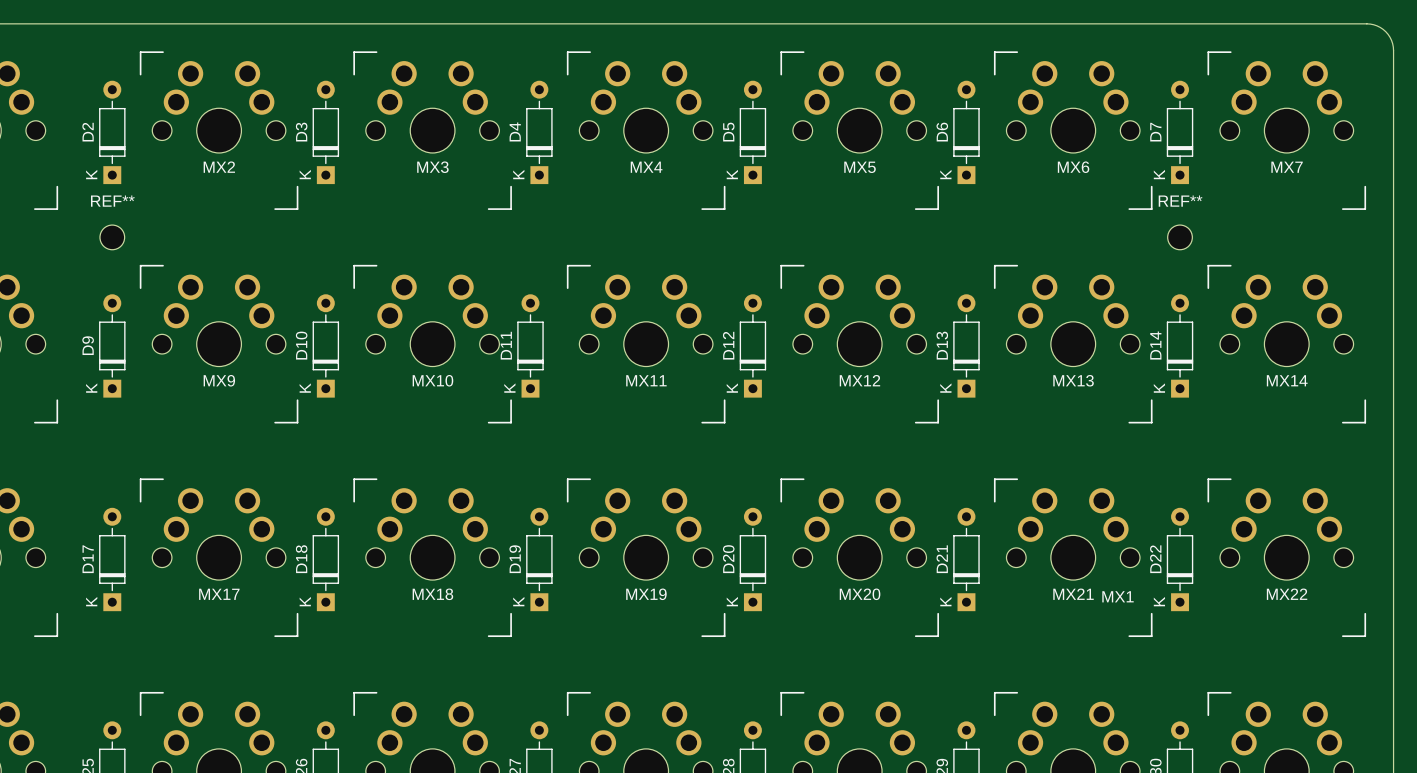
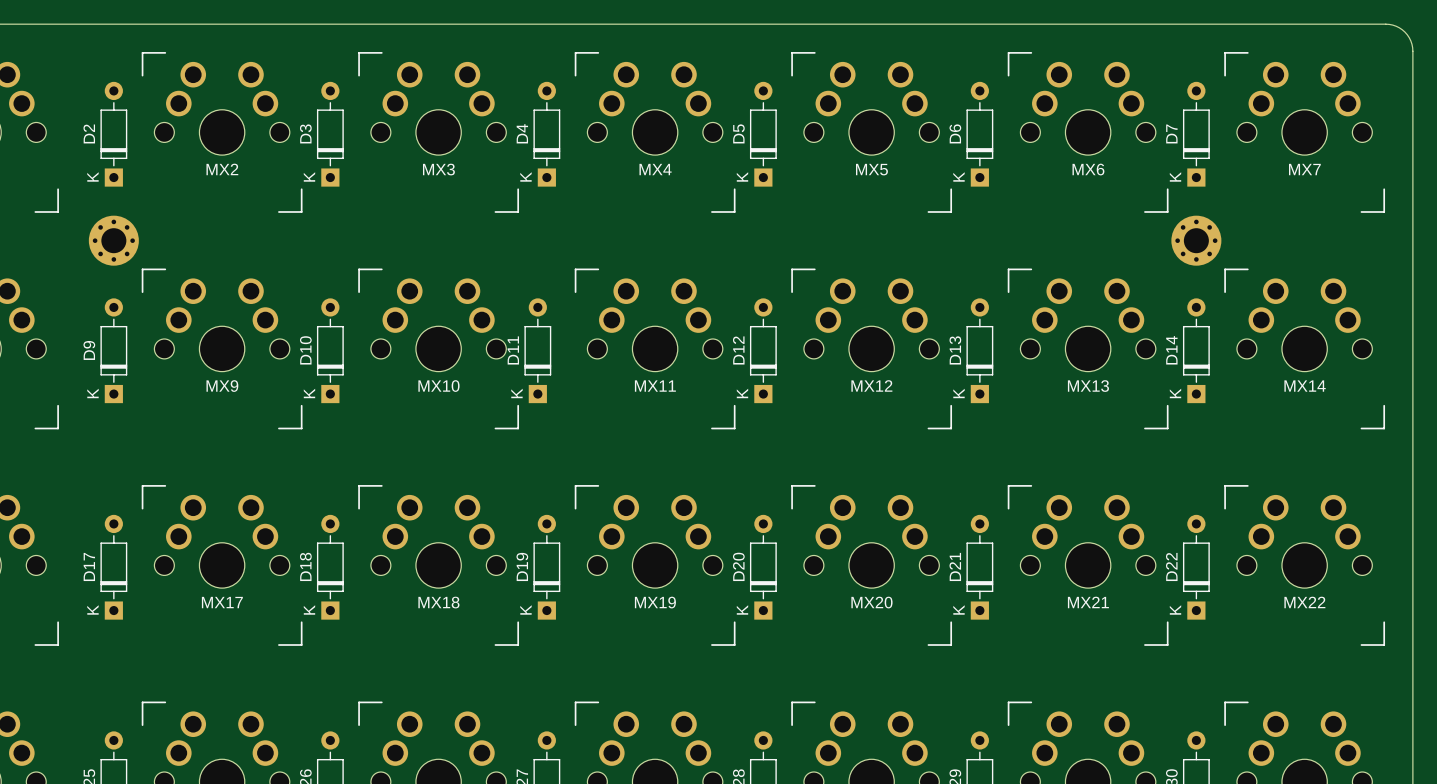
REF**: (112, 237) -> none
part: none -> (113, 240)
REF**: (1180, 237) -> none
part: none -> (1196, 240)
drawing: [1102, 591, 1134, 603] -> none

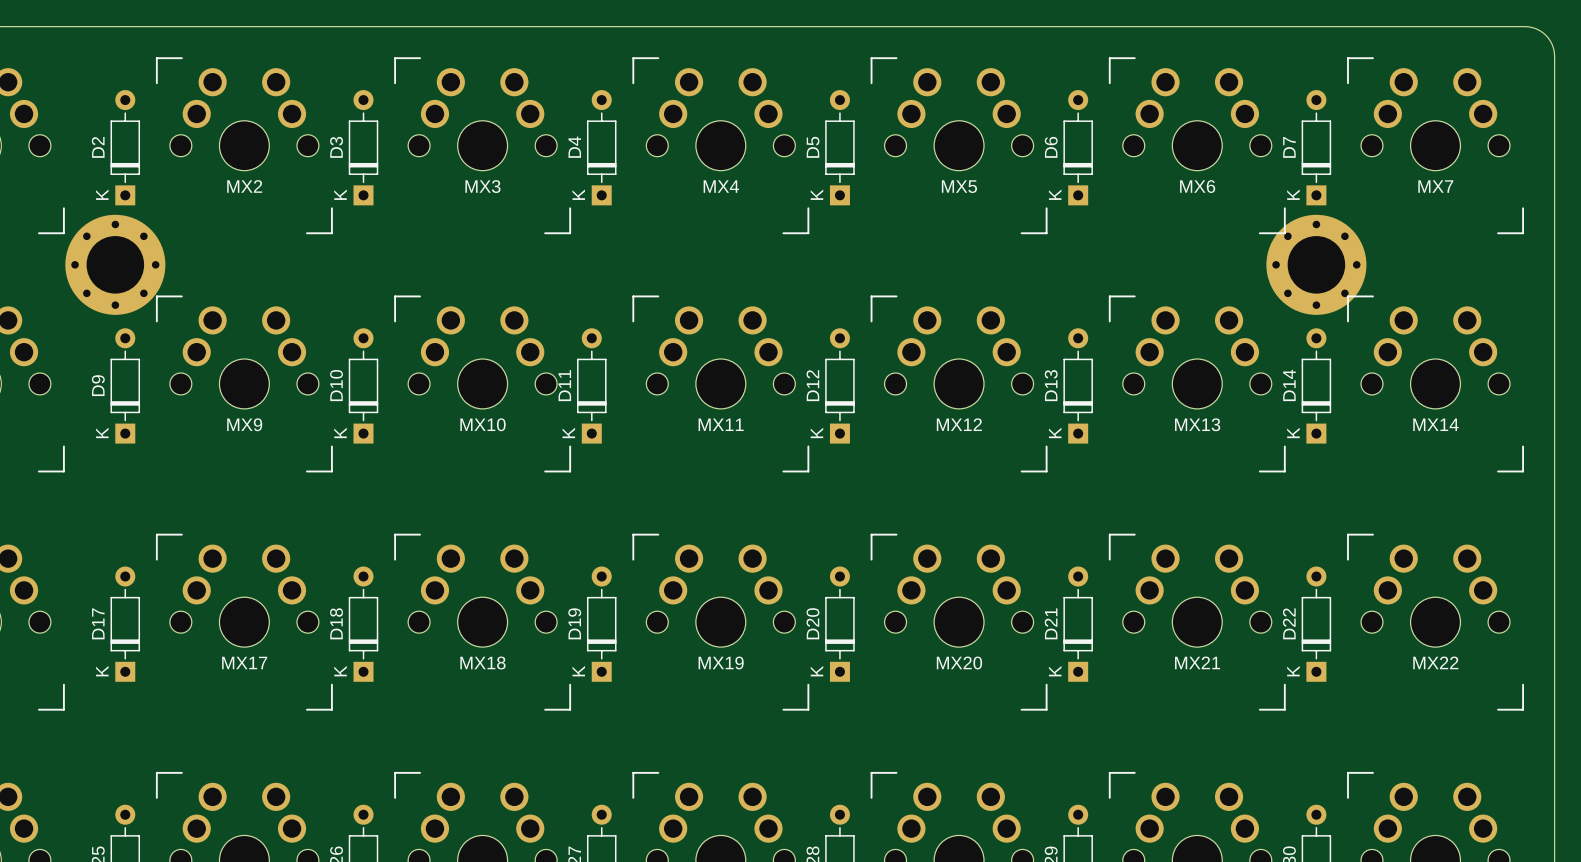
part footprint: [88, 215, 139, 266] -> [65, 214, 166, 315]
part footprint: [1171, 215, 1222, 266] -> [1266, 214, 1367, 315]

